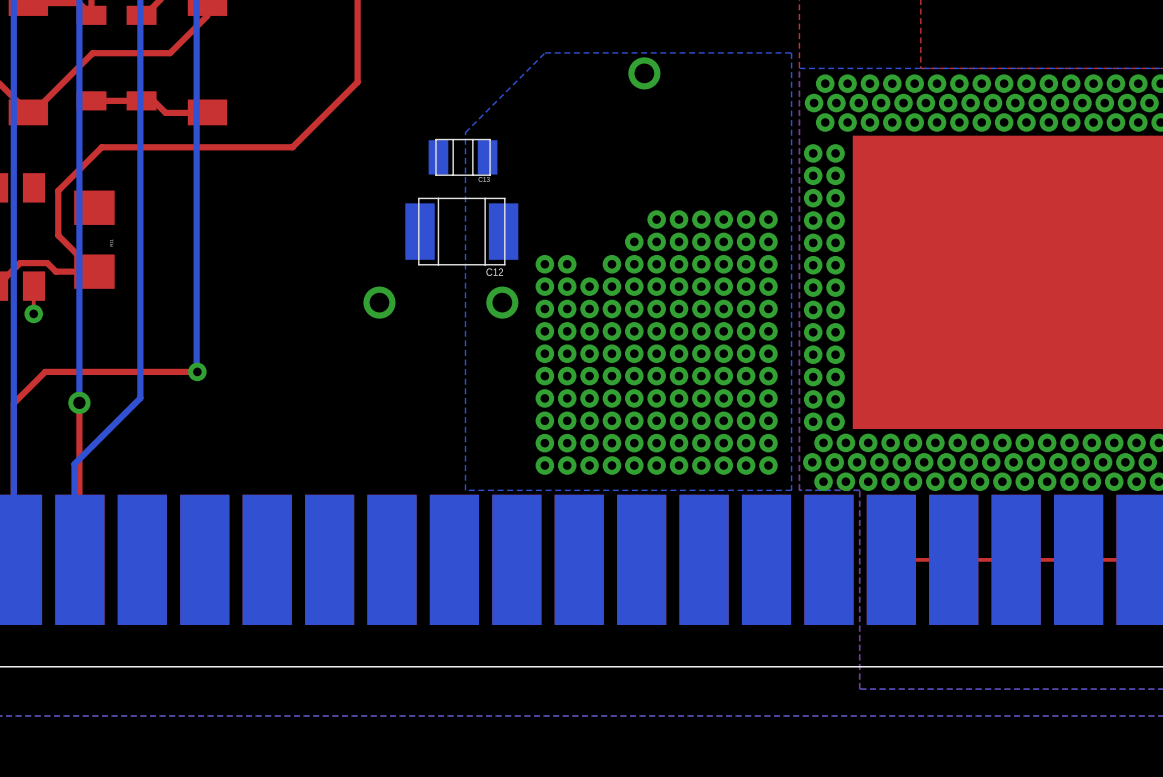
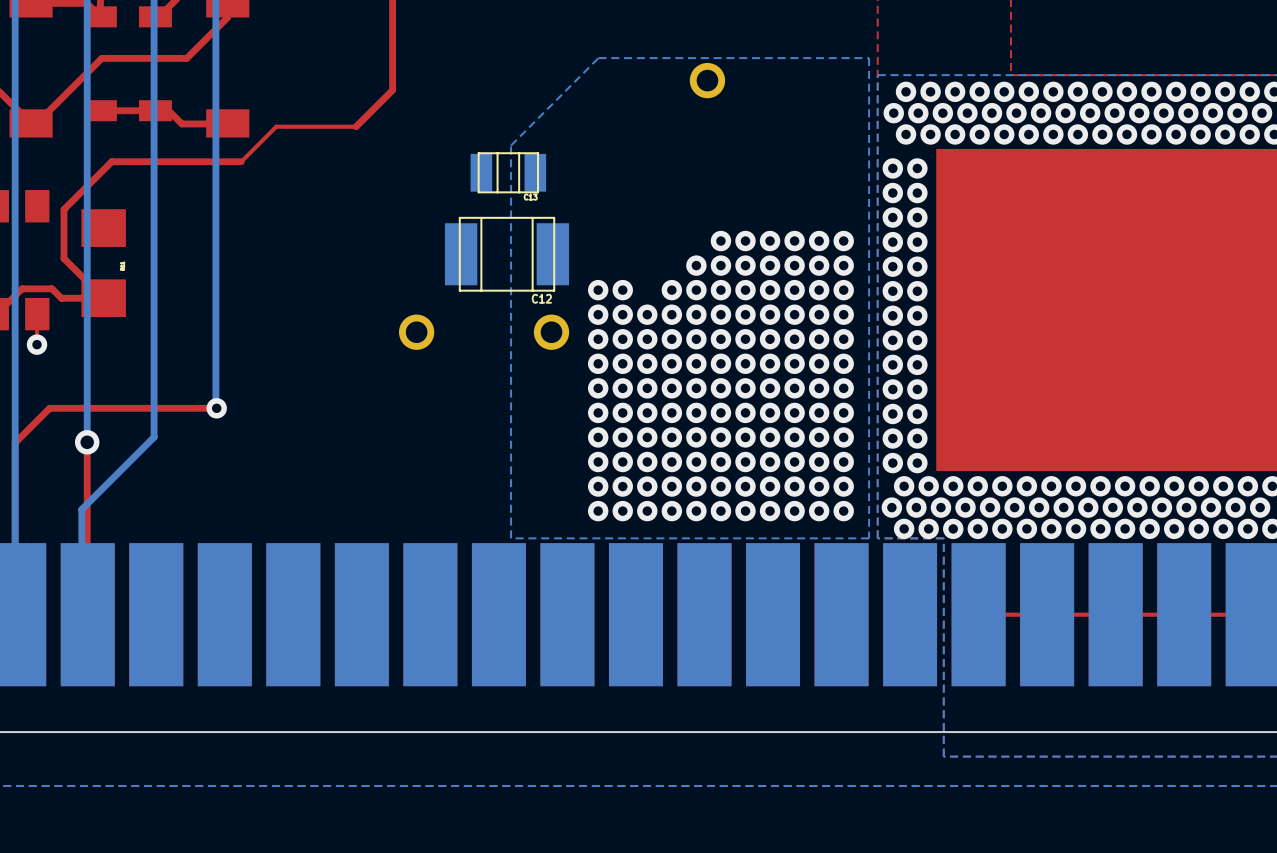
top track: (324, 115) (292, 147) (219, 147) -> (356, 126) (276, 126) (241, 161)

